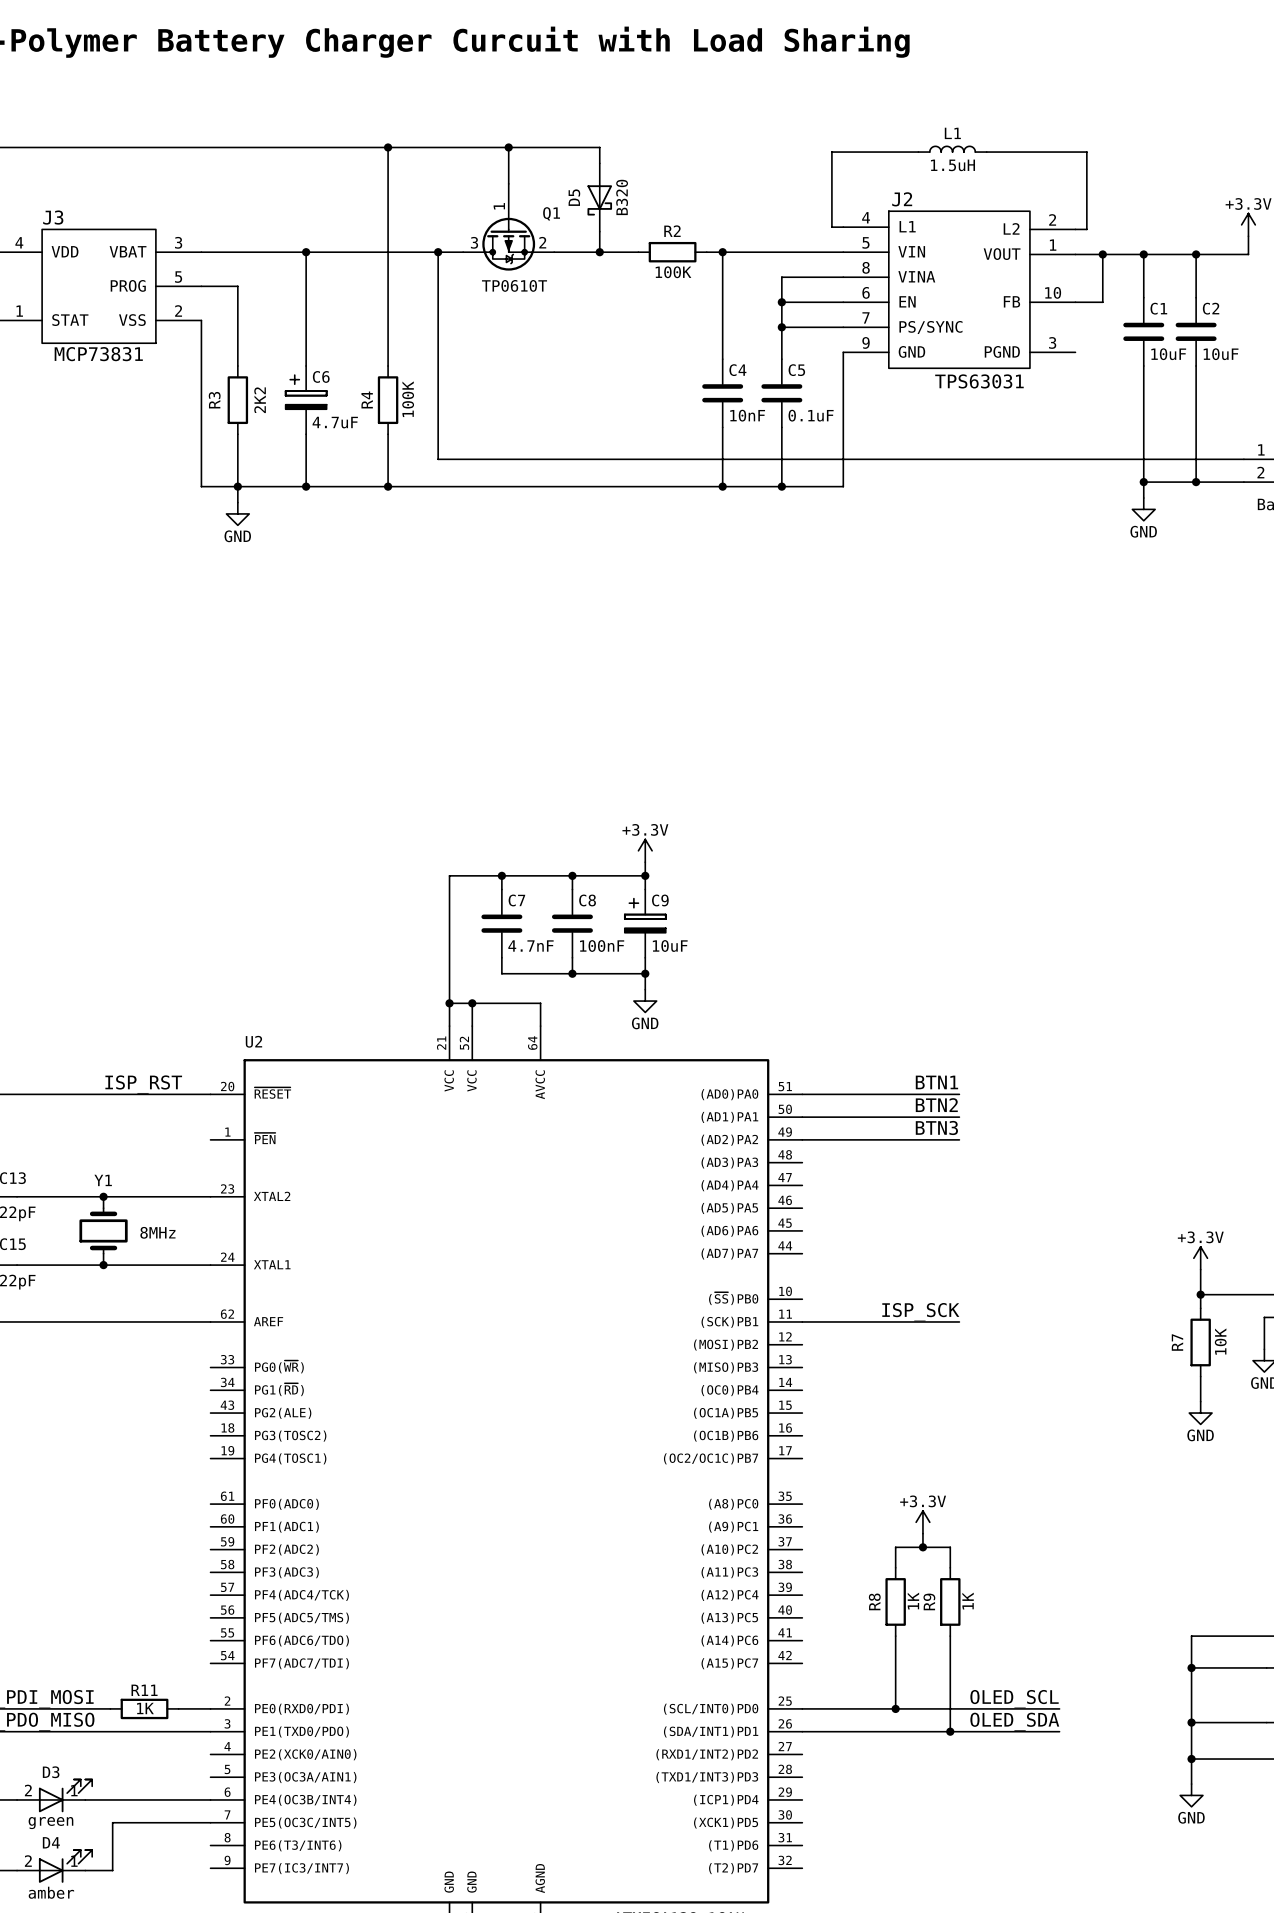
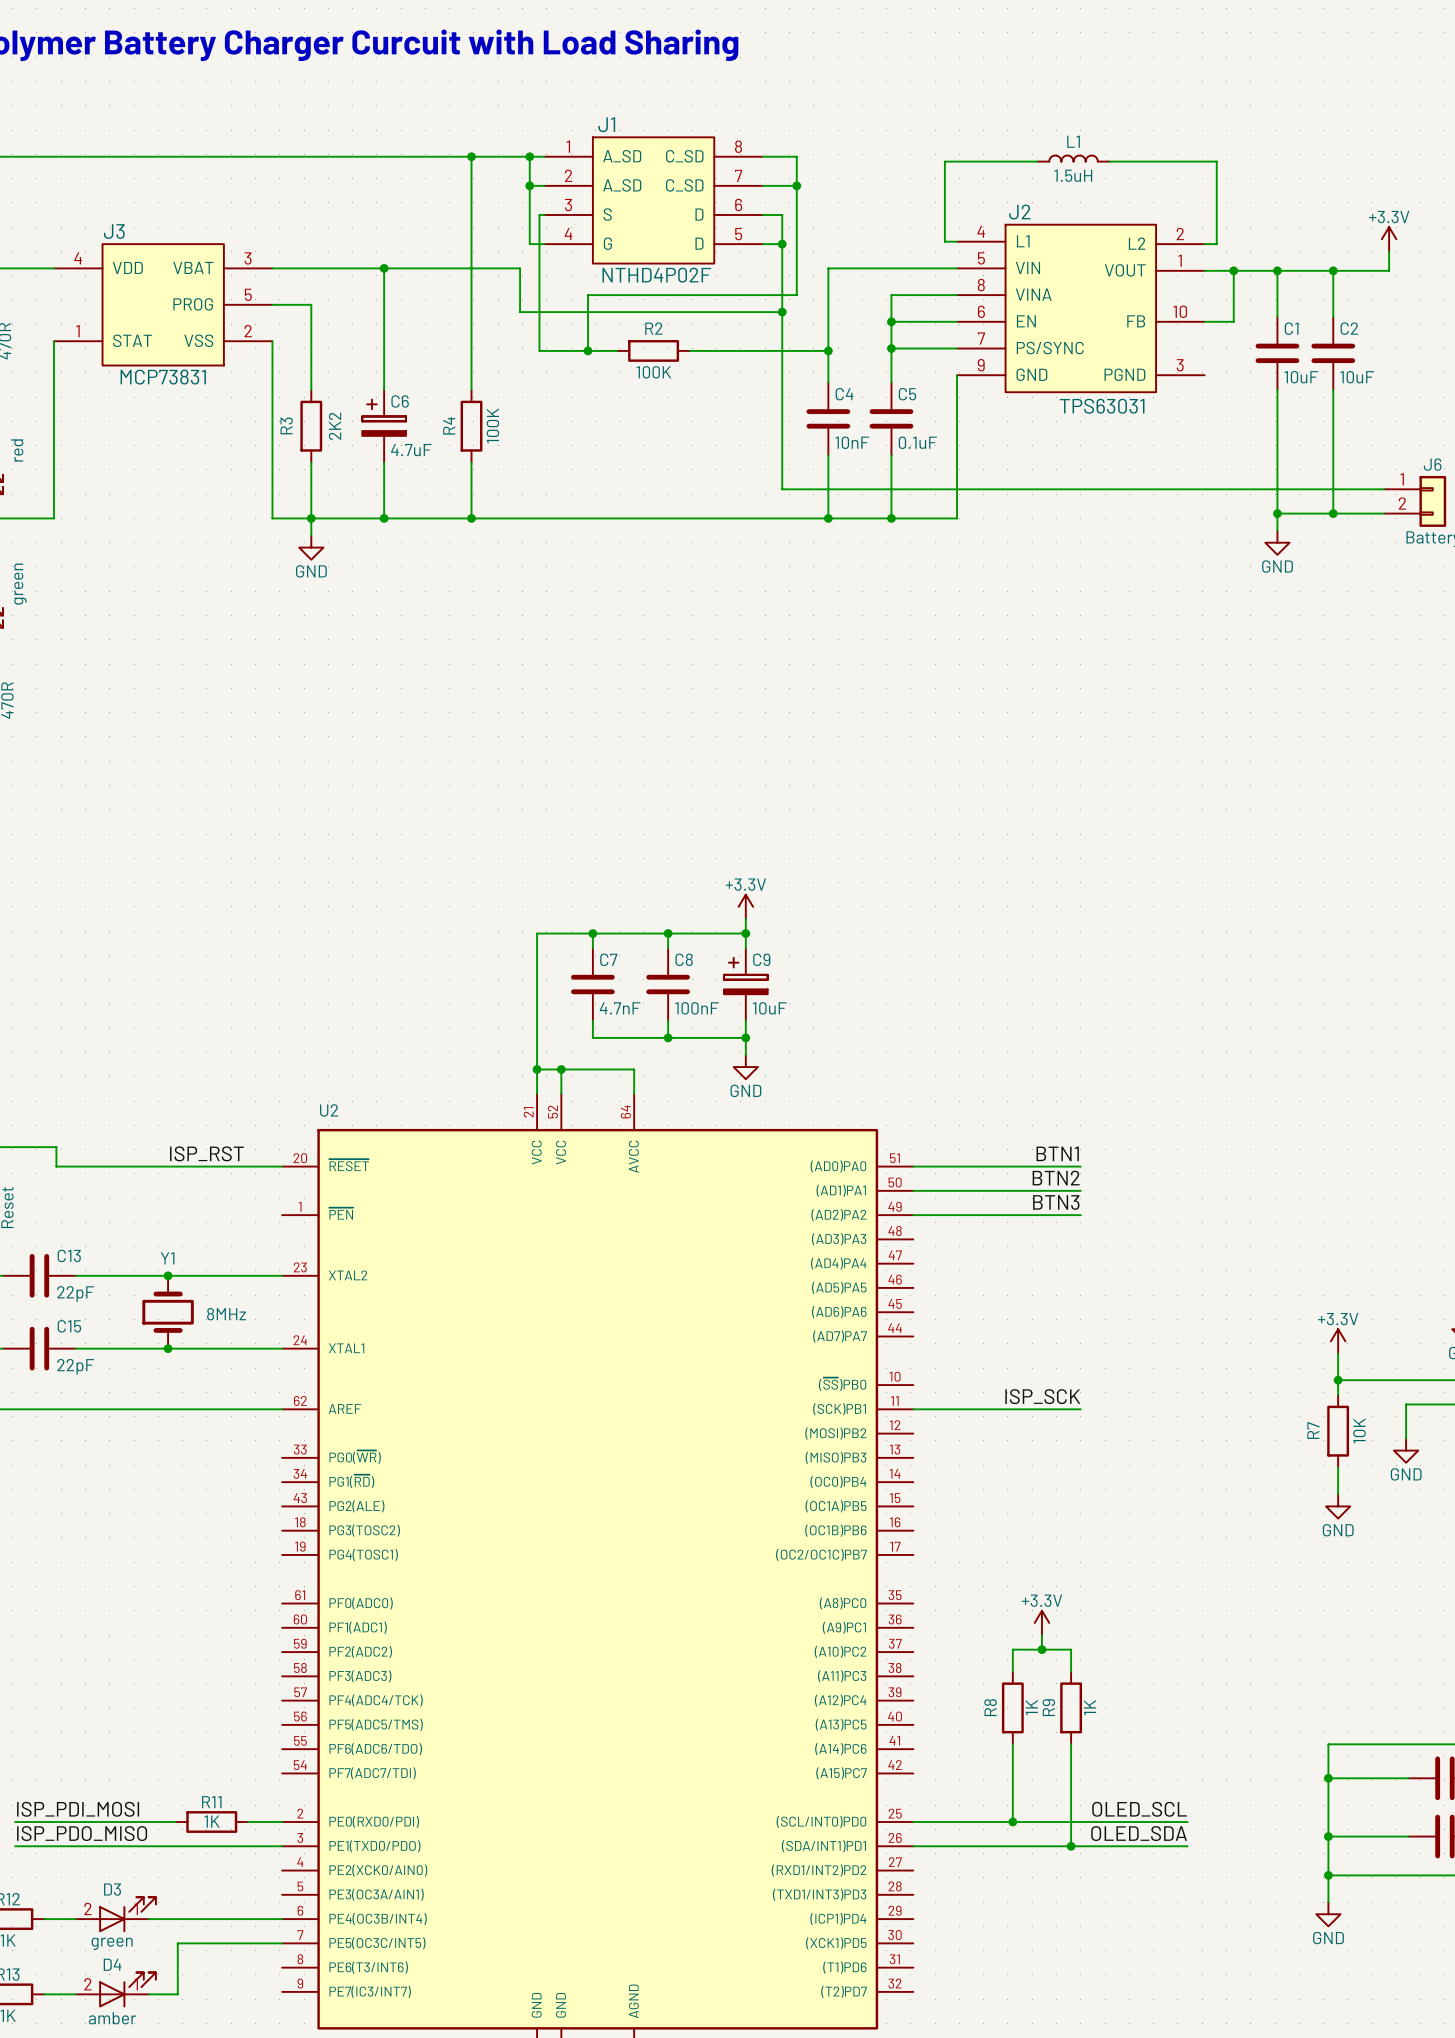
wire: none -> (529, 156) (529, 244) (544, 244)
junction: none -> (529, 156)
junction: (508, 147) -> none
wire: none -> (762, 156) (796, 156) (796, 295) (588, 295) (588, 350)
wire: none -> (529, 185) (544, 185)
junction: none -> (529, 185)
wire: none -> (762, 185) (796, 185)
junction: none -> (796, 185)
J1: none -> NTHD4P02F (653, 200)
D5: B320 (599, 197) -> none
wire: none -> (544, 215) (539, 215) (539, 350) (617, 350)
Q1: TP0610T (508, 227) -> none
wire: none -> (762, 244) (782, 244)
junction: none -> (782, 244)
wire: (433, 252) (463, 252) -> (520, 268) (520, 312) (782, 312)
wire: (438, 252) (438, 459) (679, 459) -> (762, 215) (782, 215) (782, 489)
junction: (438, 252) -> none
wire: (554, 252) (638, 252) -> none
junction: (599, 252) -> none
R2 position: (672, 252) -> (653, 350)
wire: (706, 252) (722, 252) -> none
junction: (722, 252) -> none
junction: none -> (782, 312)
junction: none -> (588, 350)
wire: none -> (689, 350) (828, 350)
junction: none -> (828, 350)

